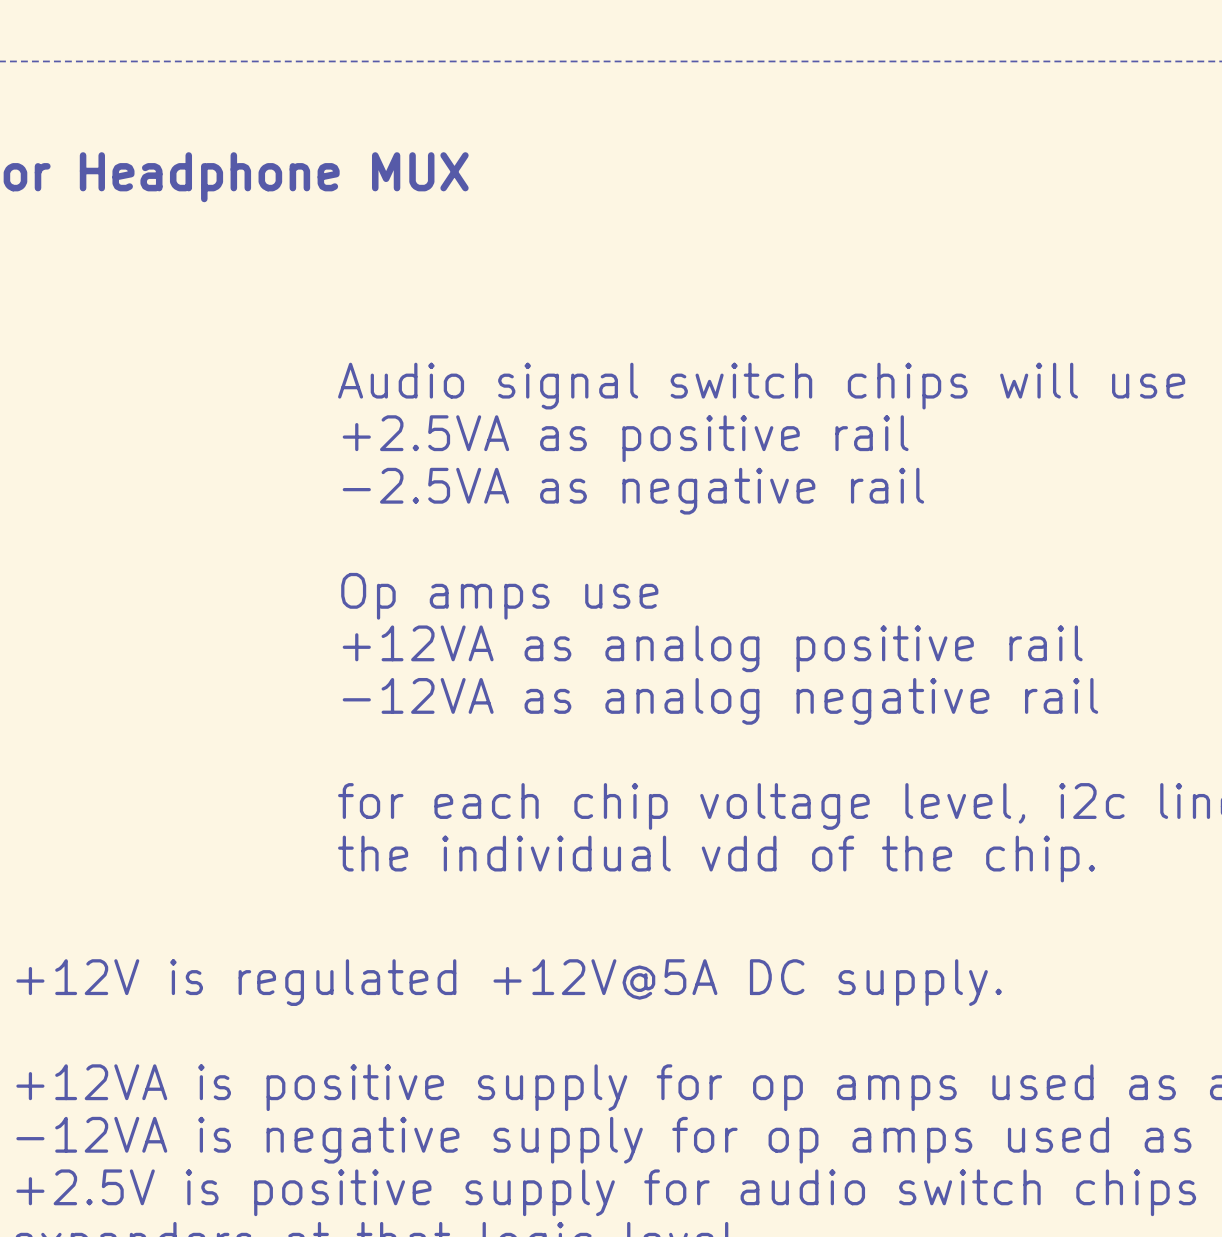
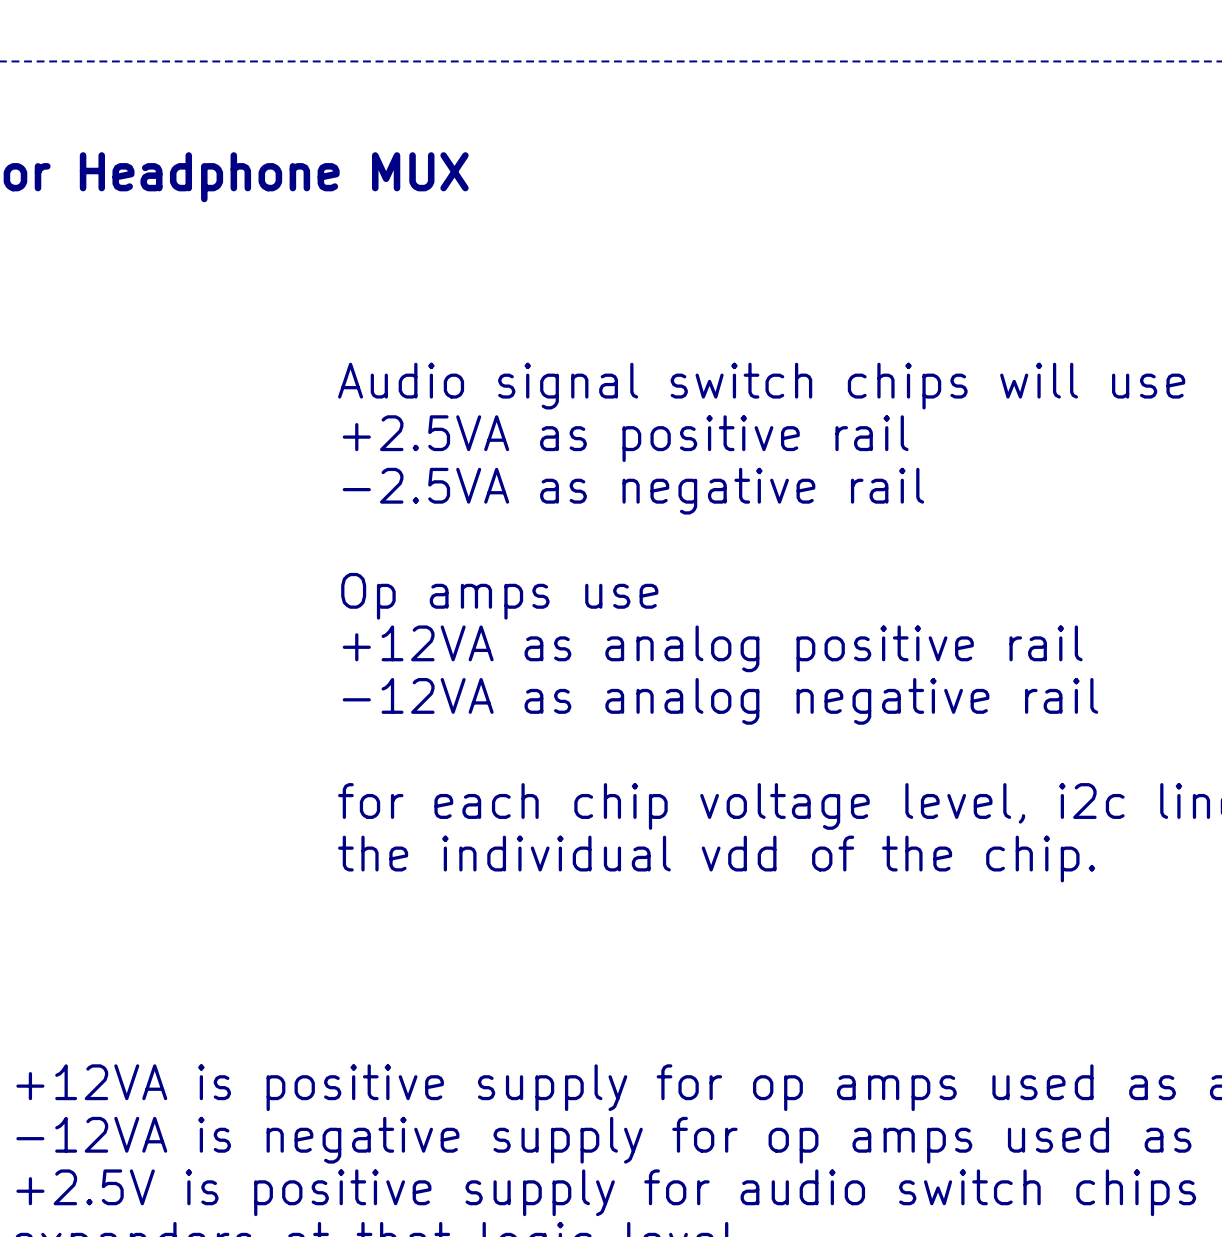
text: +12V is regulated +12V@5A DC supply. (509, 982) -> none

